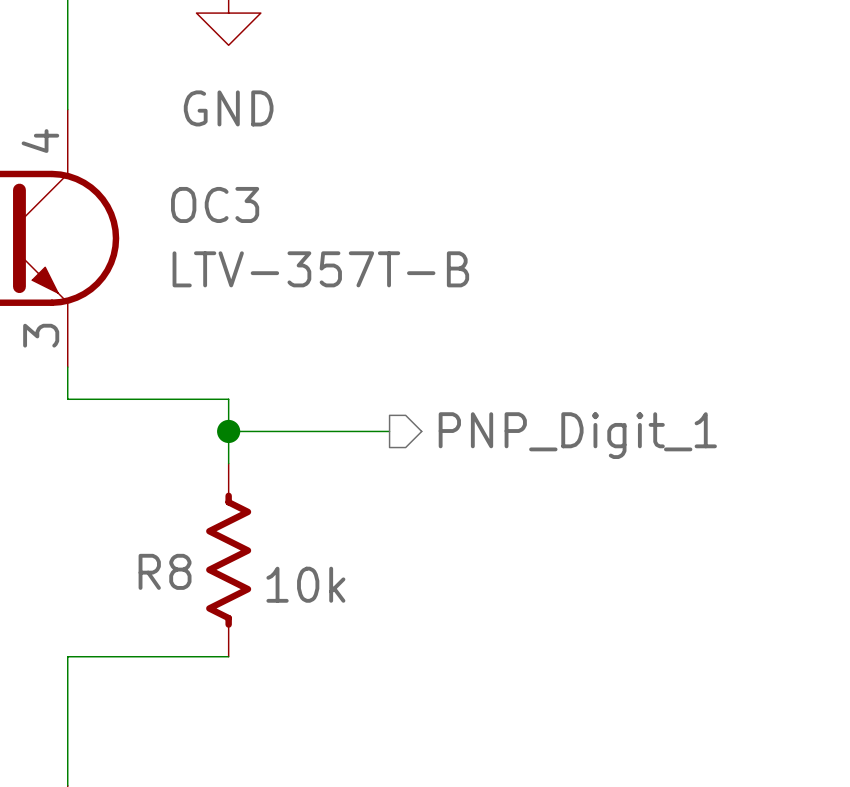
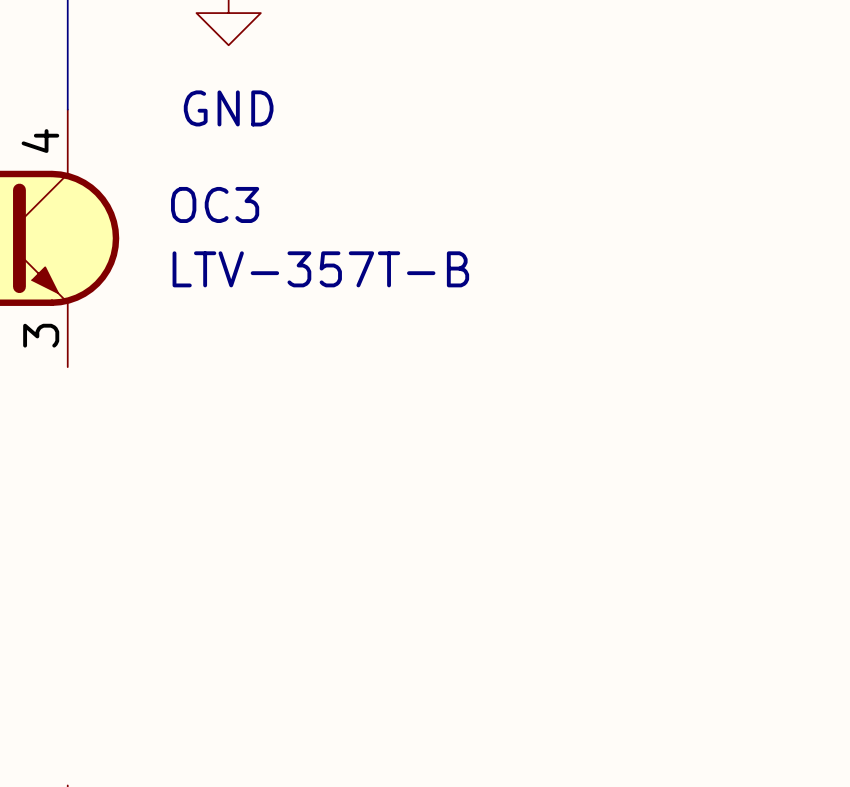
wire: (67, 367) (67, 399) (228, 399) (228, 463) -> none
wire: (228, 431) (389, 431) -> none
junction: (228, 431) -> none
hierarchical label: PNP_Digit_1 (577, 435) -> none
R8: (228, 560) -> none
wire: (228, 656) (67, 656) (67, 785) -> none

